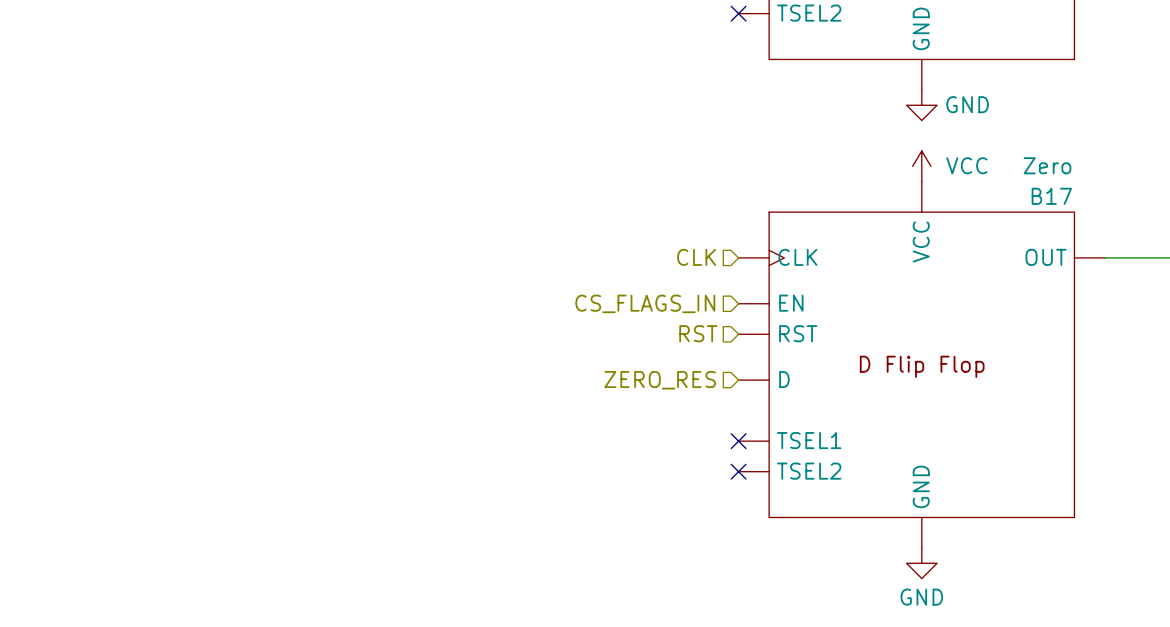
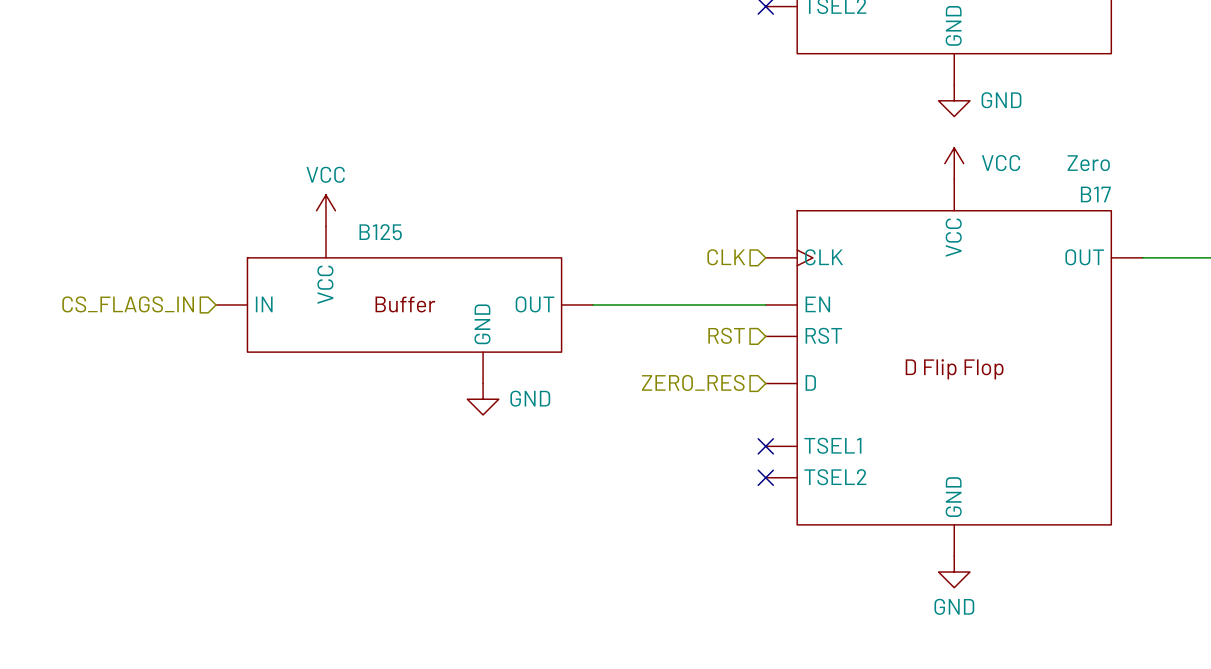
power symbol: none -> VCC (325, 210)
hierarchical label: none -> CS_FLAGS_IN (128, 304)
B125: none -> (404, 304)
wire: none -> (593, 304) (765, 304)
hierarchical label: CS_FLAGS_IN (645, 303) -> none
power symbol: none -> GND (483, 399)

